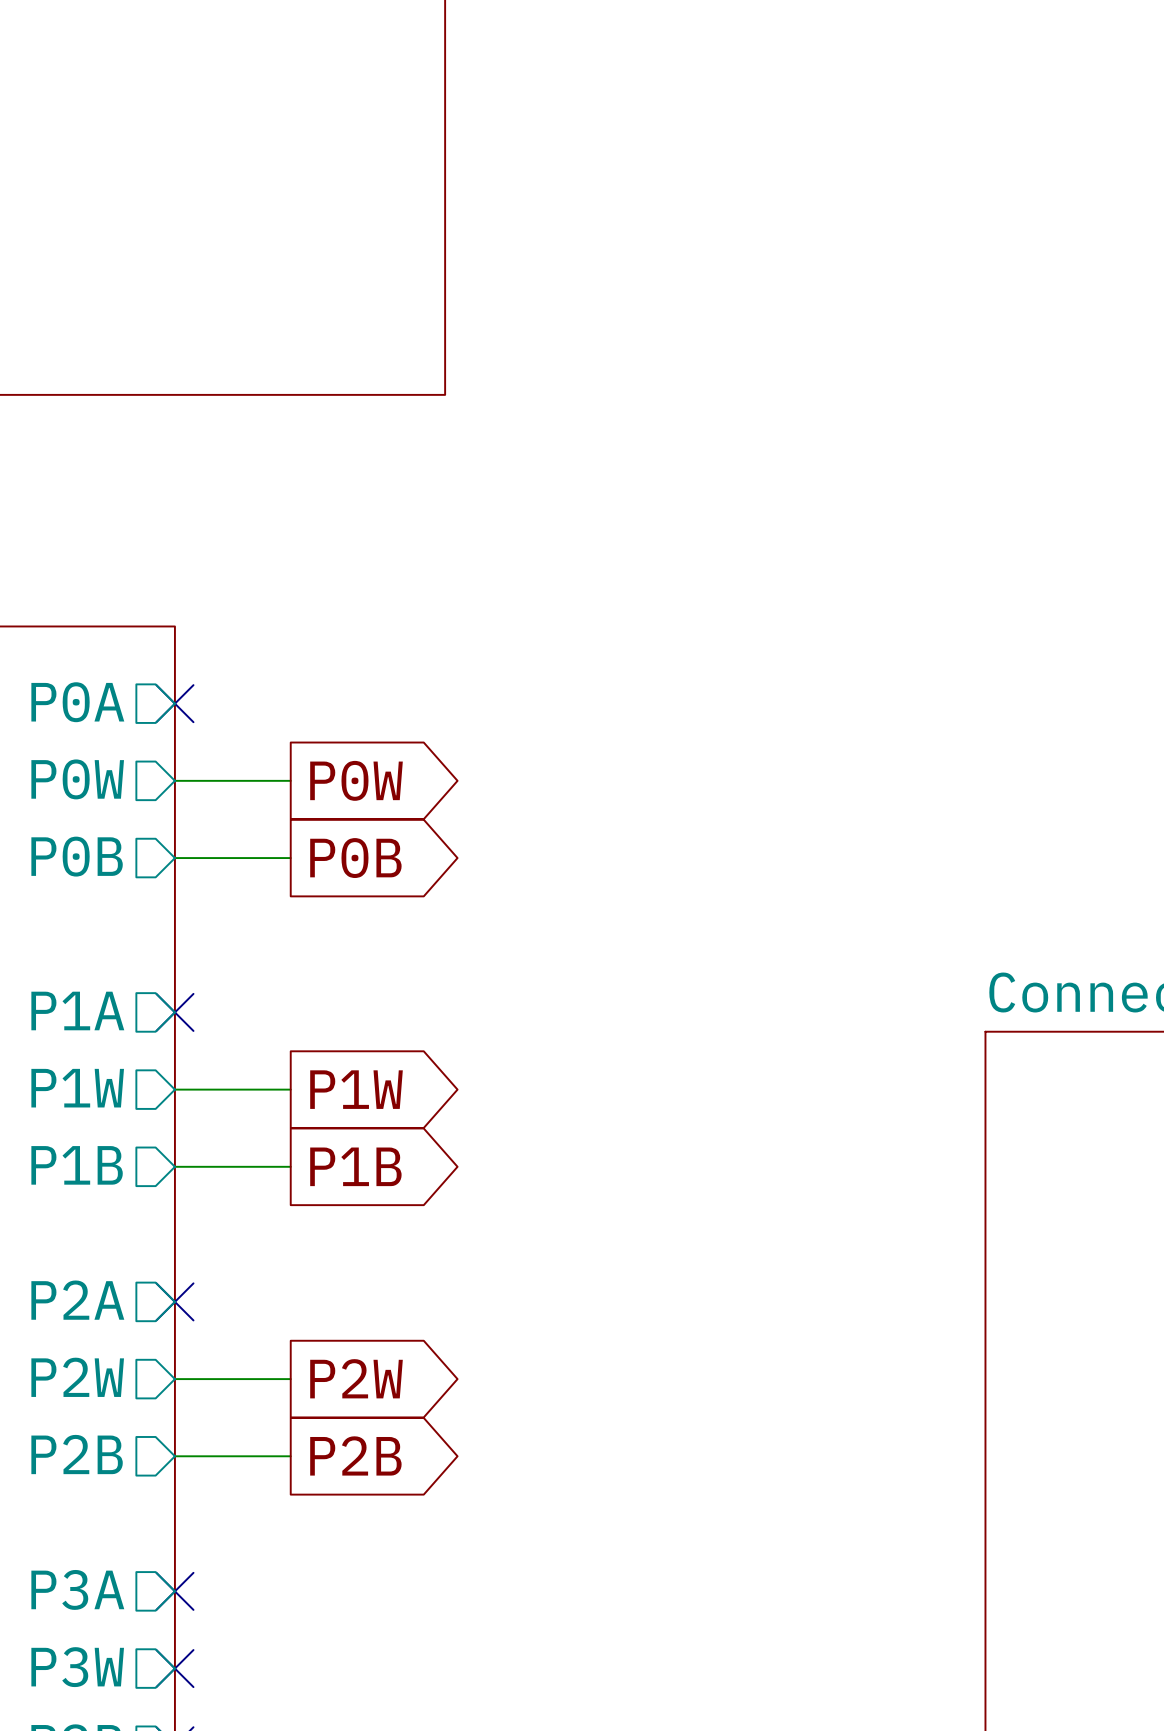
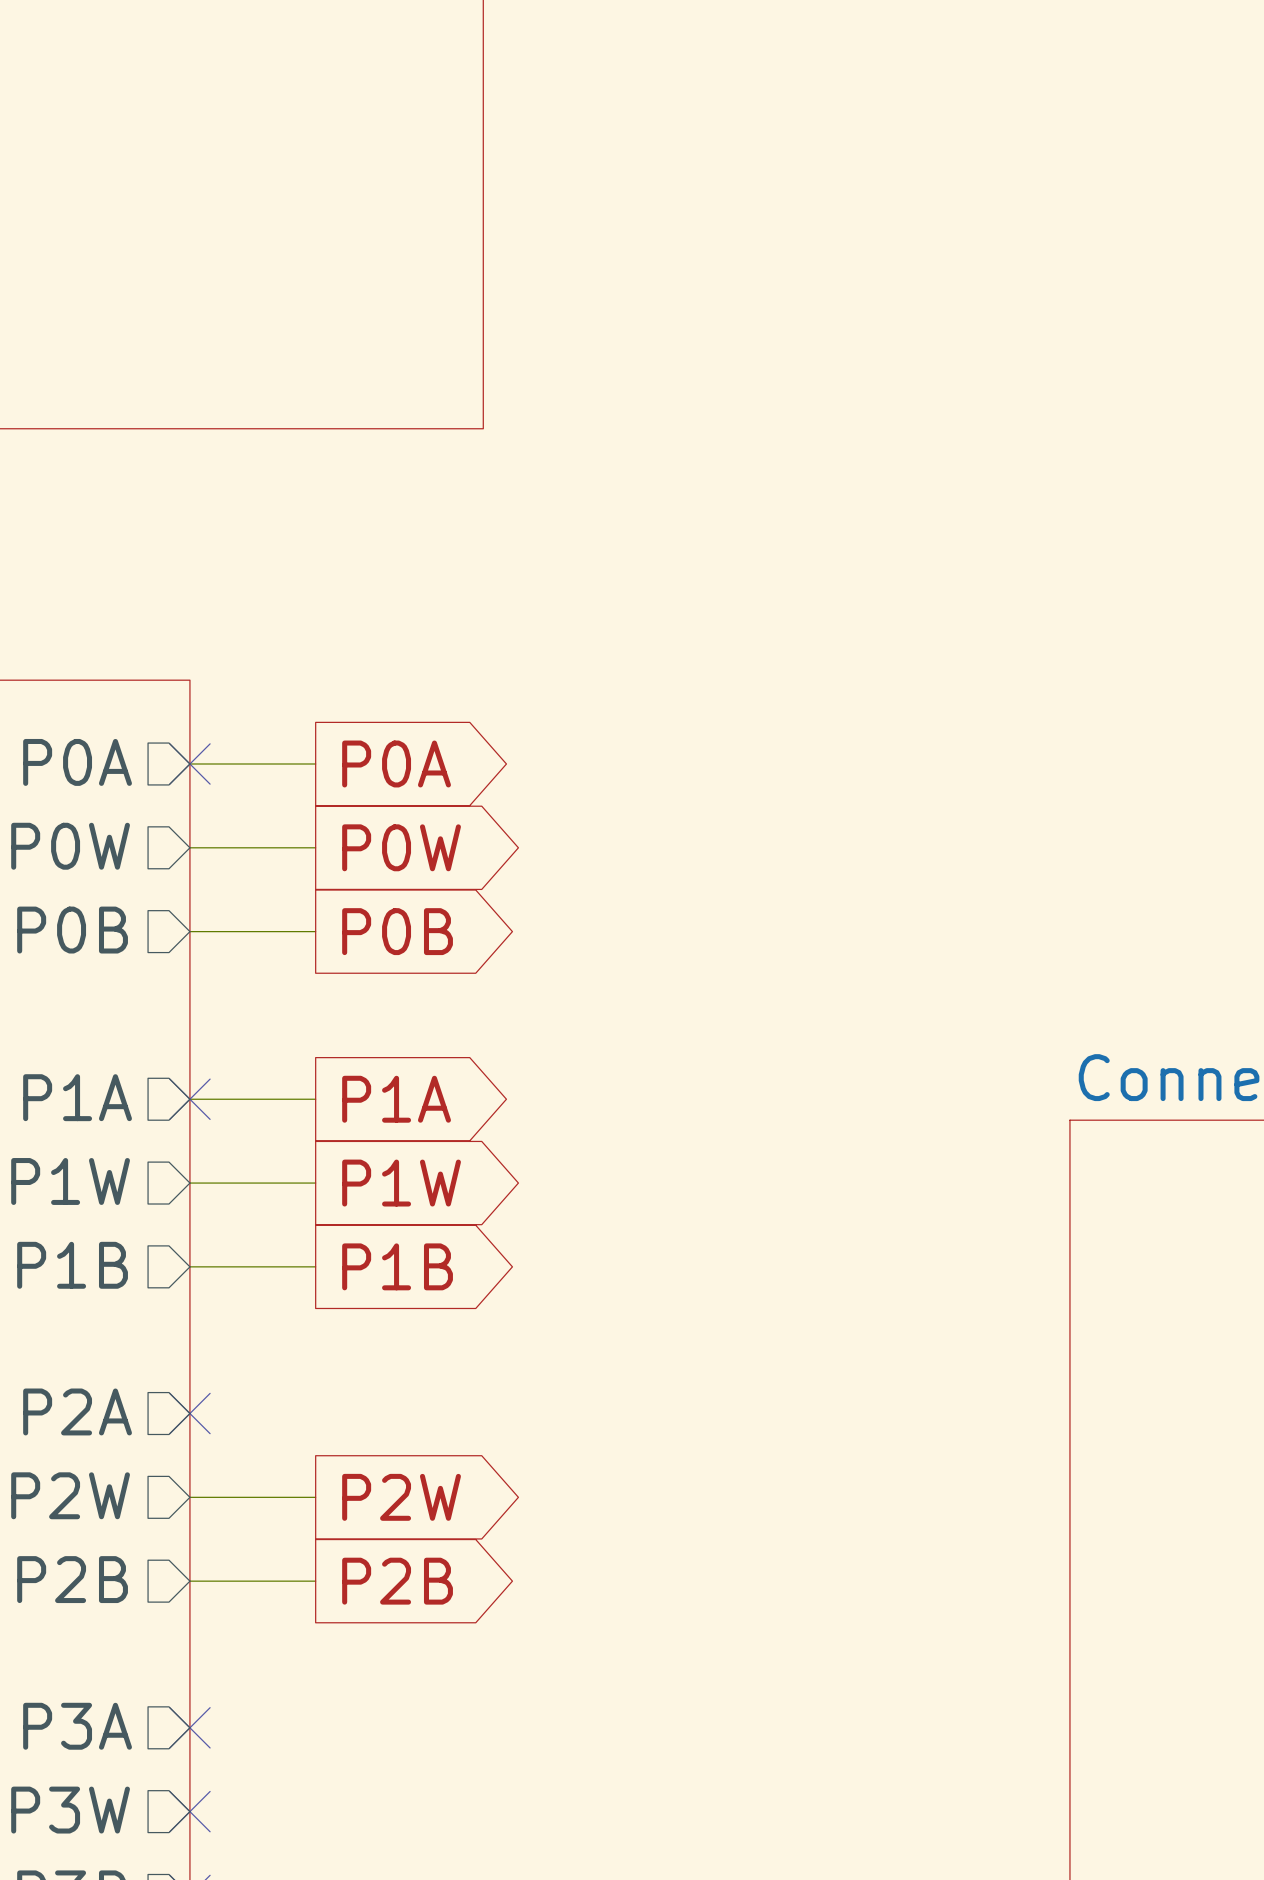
wire: none -> (189, 763) (315, 763)
global label: none -> P0A (396, 763)
wire: none -> (189, 1099) (315, 1099)
global label: none -> P1A (396, 1099)

